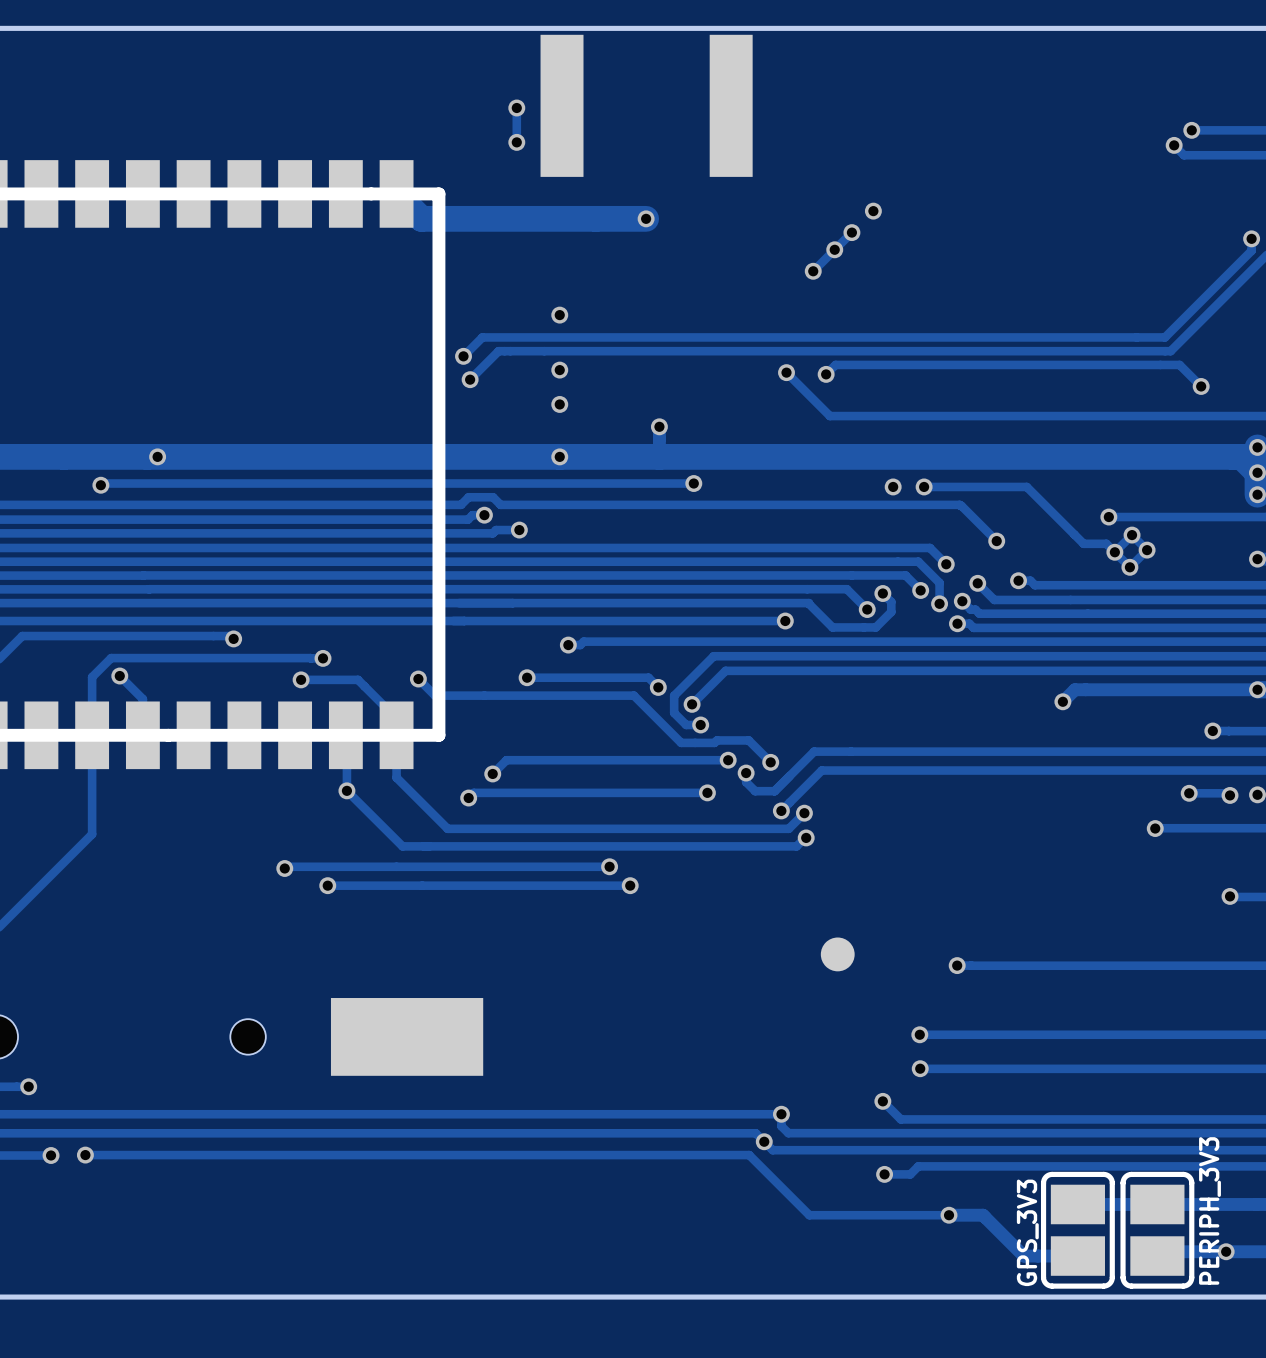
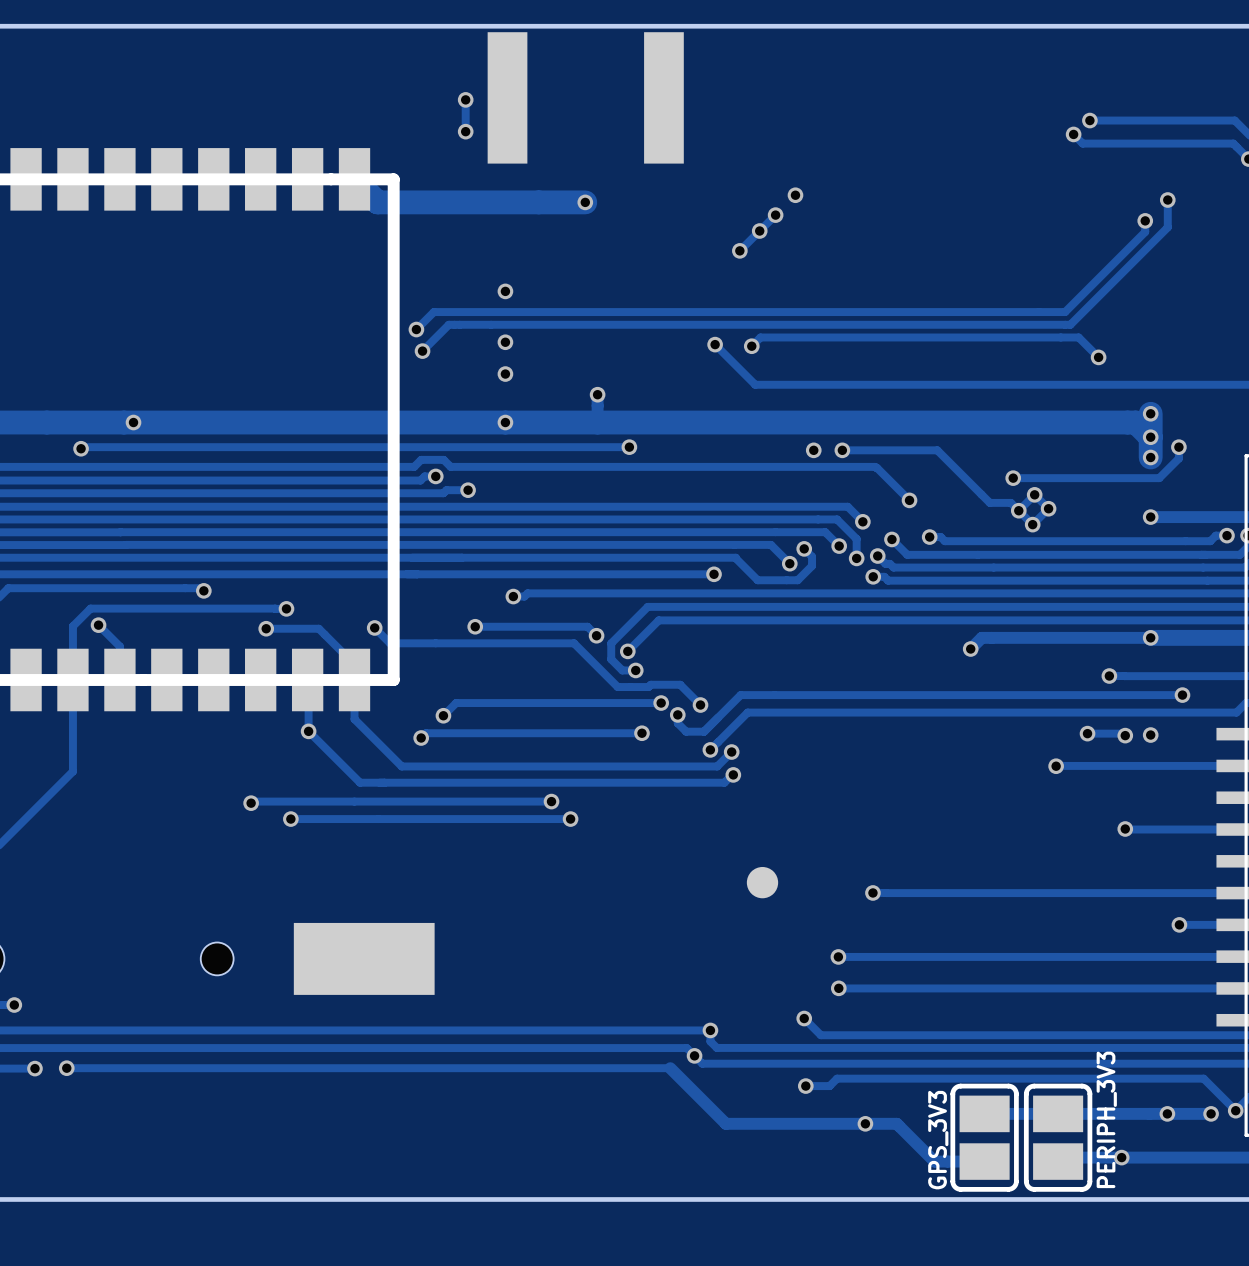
track: (738, 1155) (749, 1155) (809, 1215) -> (670, 1068) (725, 1123) (865, 1123)

